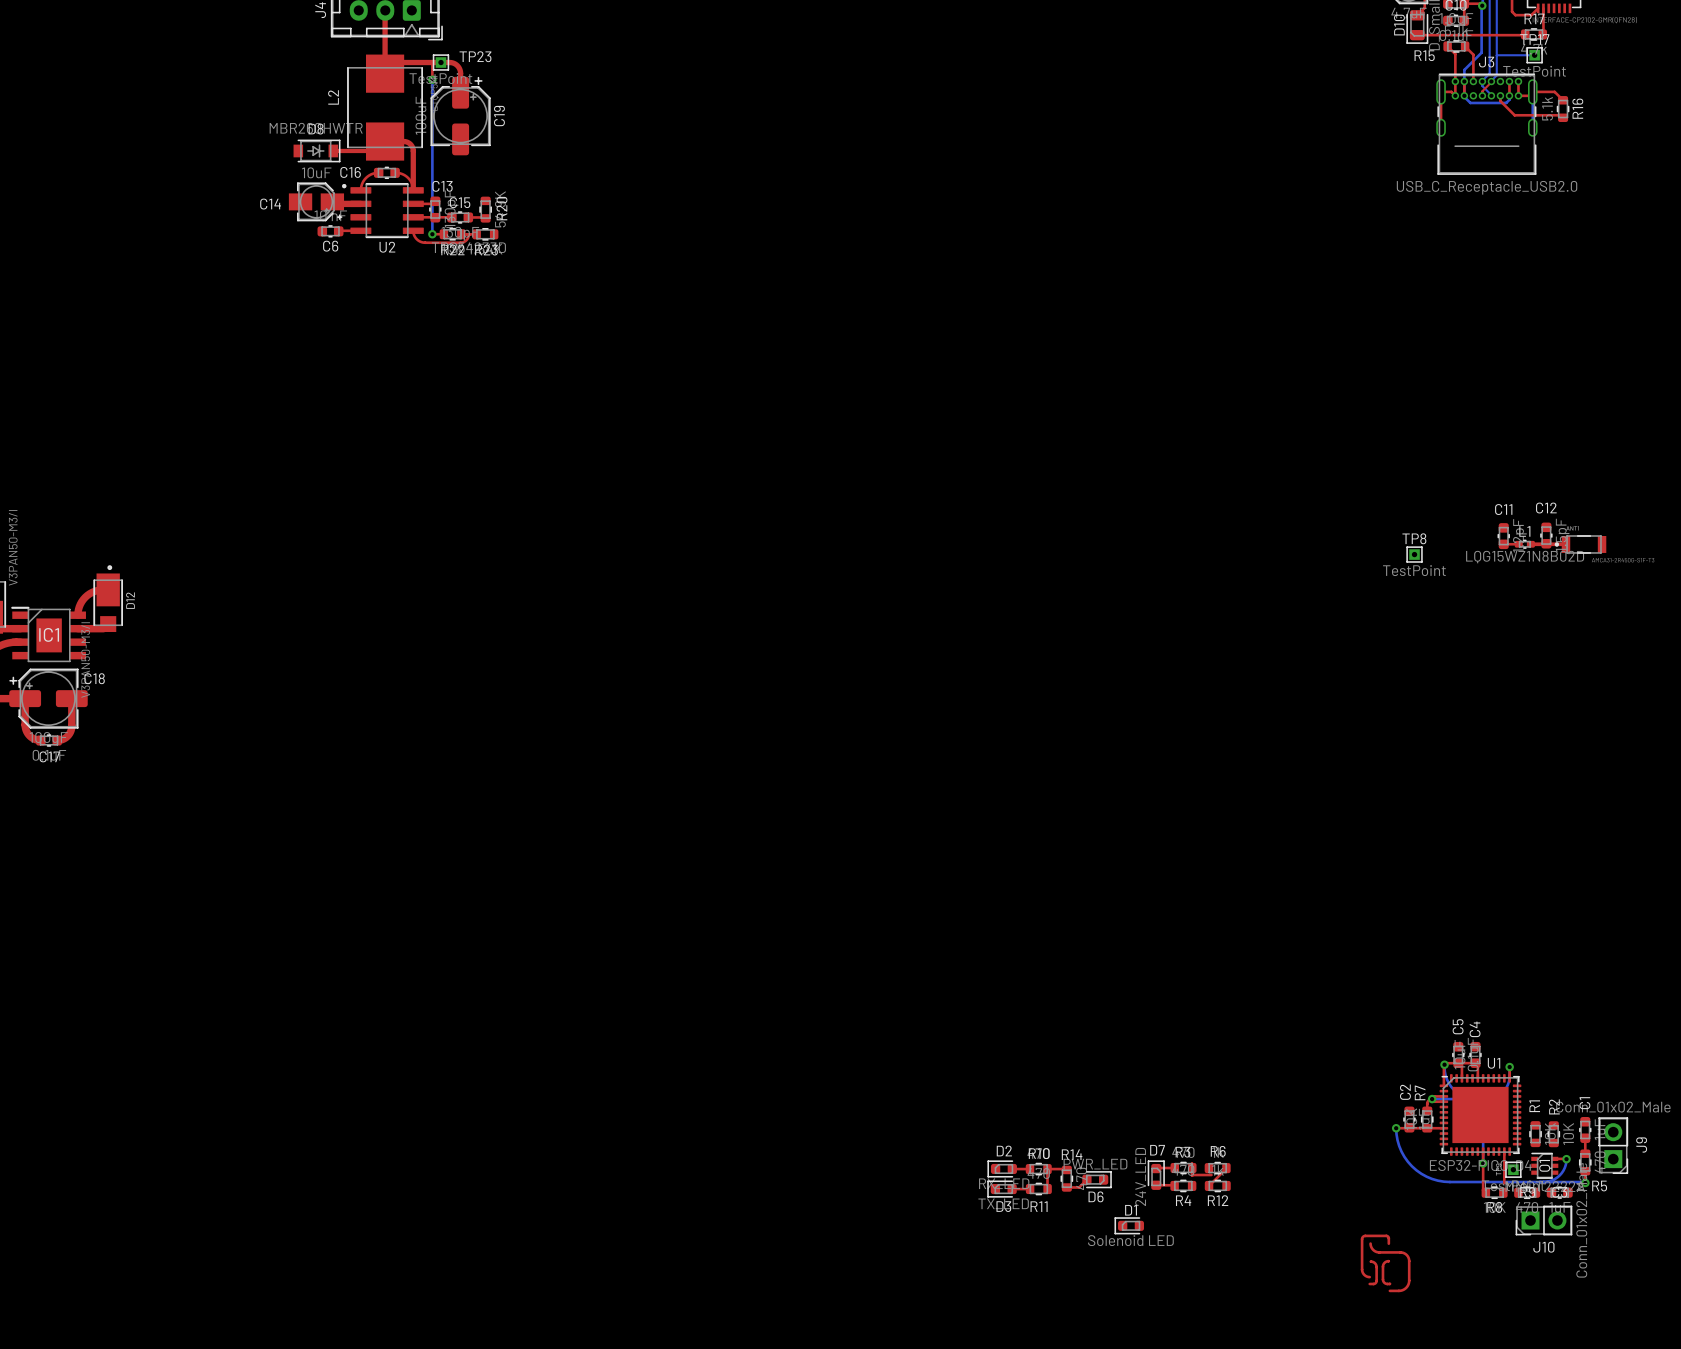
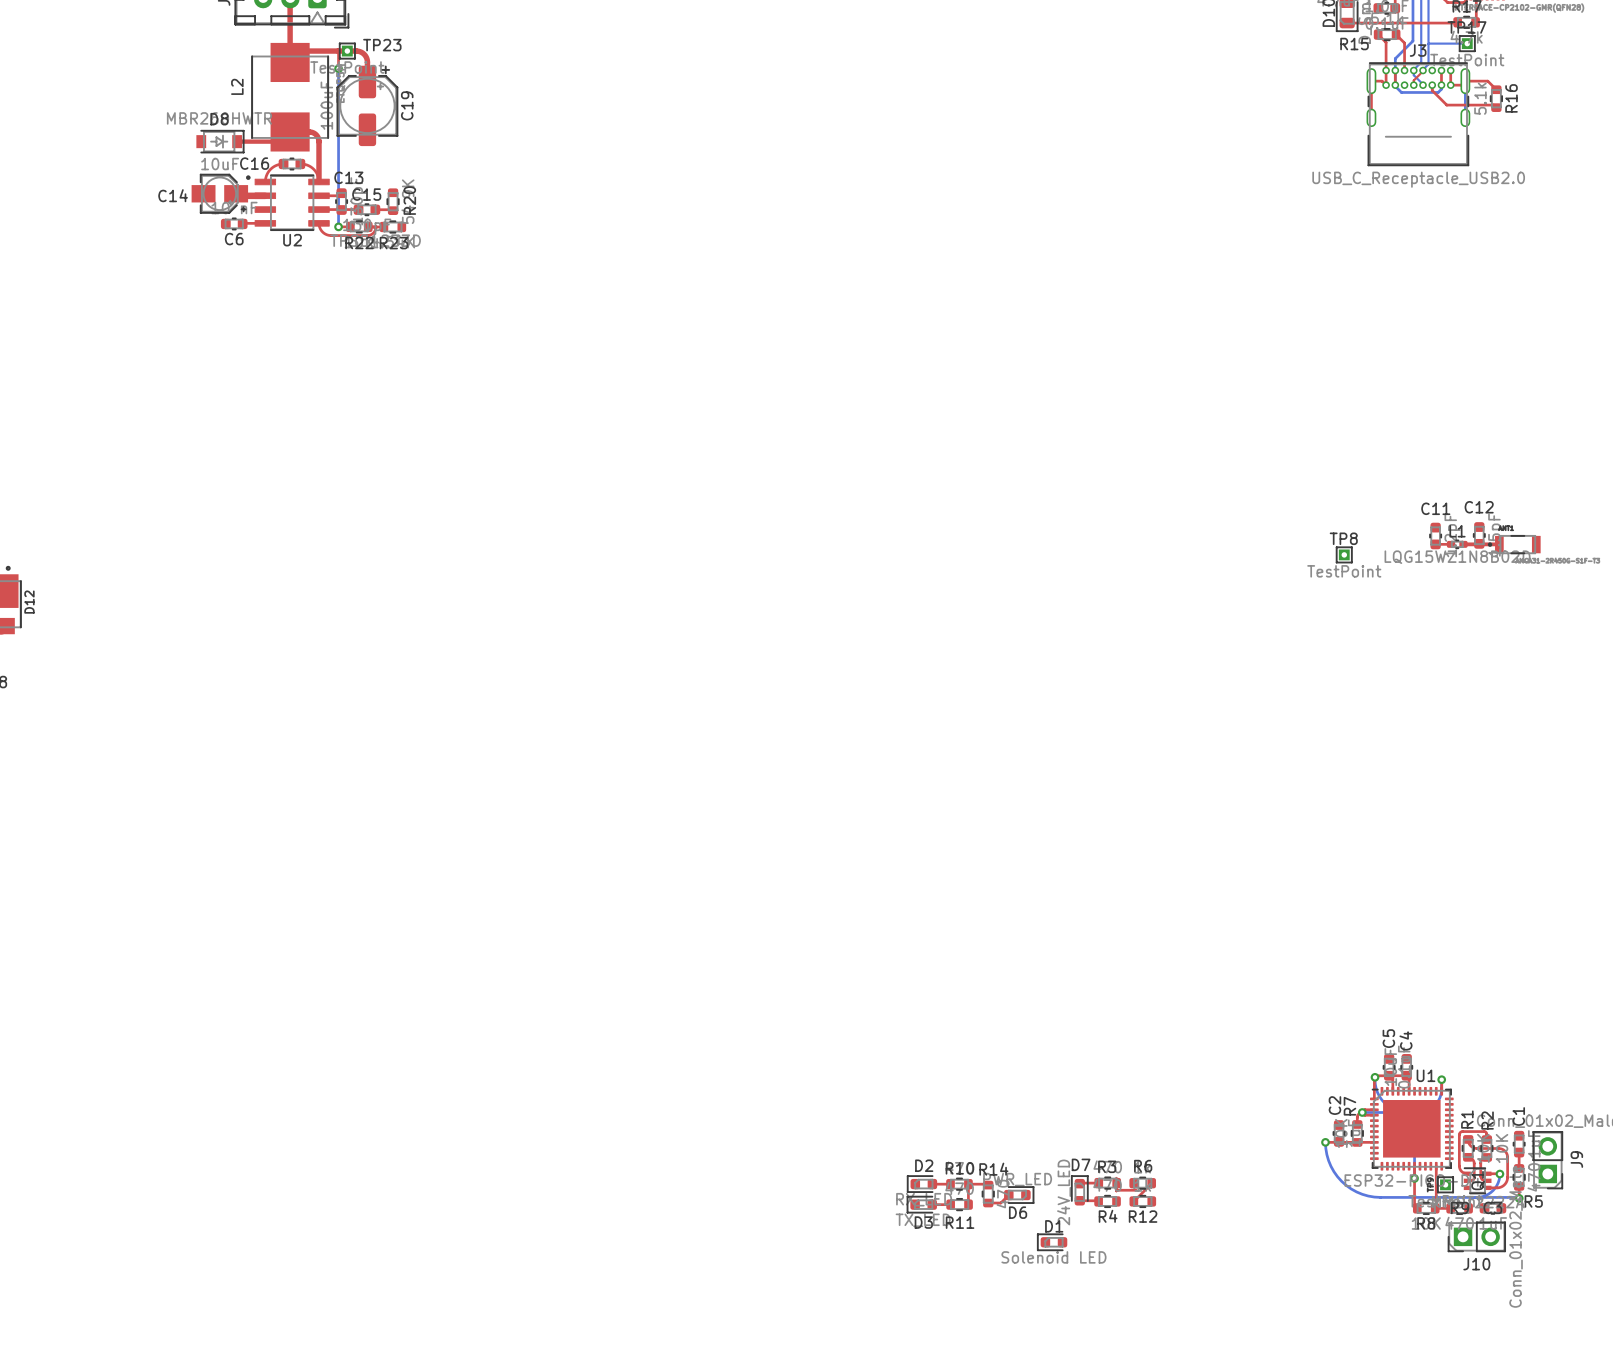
top track: none -> (1435, 1208) (1450, 1208)
top track: (1370, 1243) (1376, 1251) (1402, 1252) (1408, 1258) (1407, 1285) (1401, 1290) (1389, 1290) -> (1468, 1139) (1469, 1143) (1473, 1147) (1500, 1148) (1507, 1154) (1506, 1182) (1499, 1187) (1487, 1187)
top track: (1388, 1243) (1386, 1235) (1362, 1237) (1362, 1270) (1365, 1275) (1369, 1277) -> (1486, 1139) (1484, 1131) (1459, 1133) (1459, 1166) (1461, 1171) (1467, 1173)
top track: (1370, 1261) (1376, 1265) (1376, 1280) (1374, 1283) (1369, 1283) -> (1468, 1157) (1473, 1161) (1474, 1177) (1472, 1180) (1467, 1180)
top track: (1388, 1261) (1383, 1265) (1382, 1279) (1385, 1283) (1390, 1283) -> (1486, 1157) (1480, 1161) (1480, 1176) (1483, 1180) (1487, 1180)

